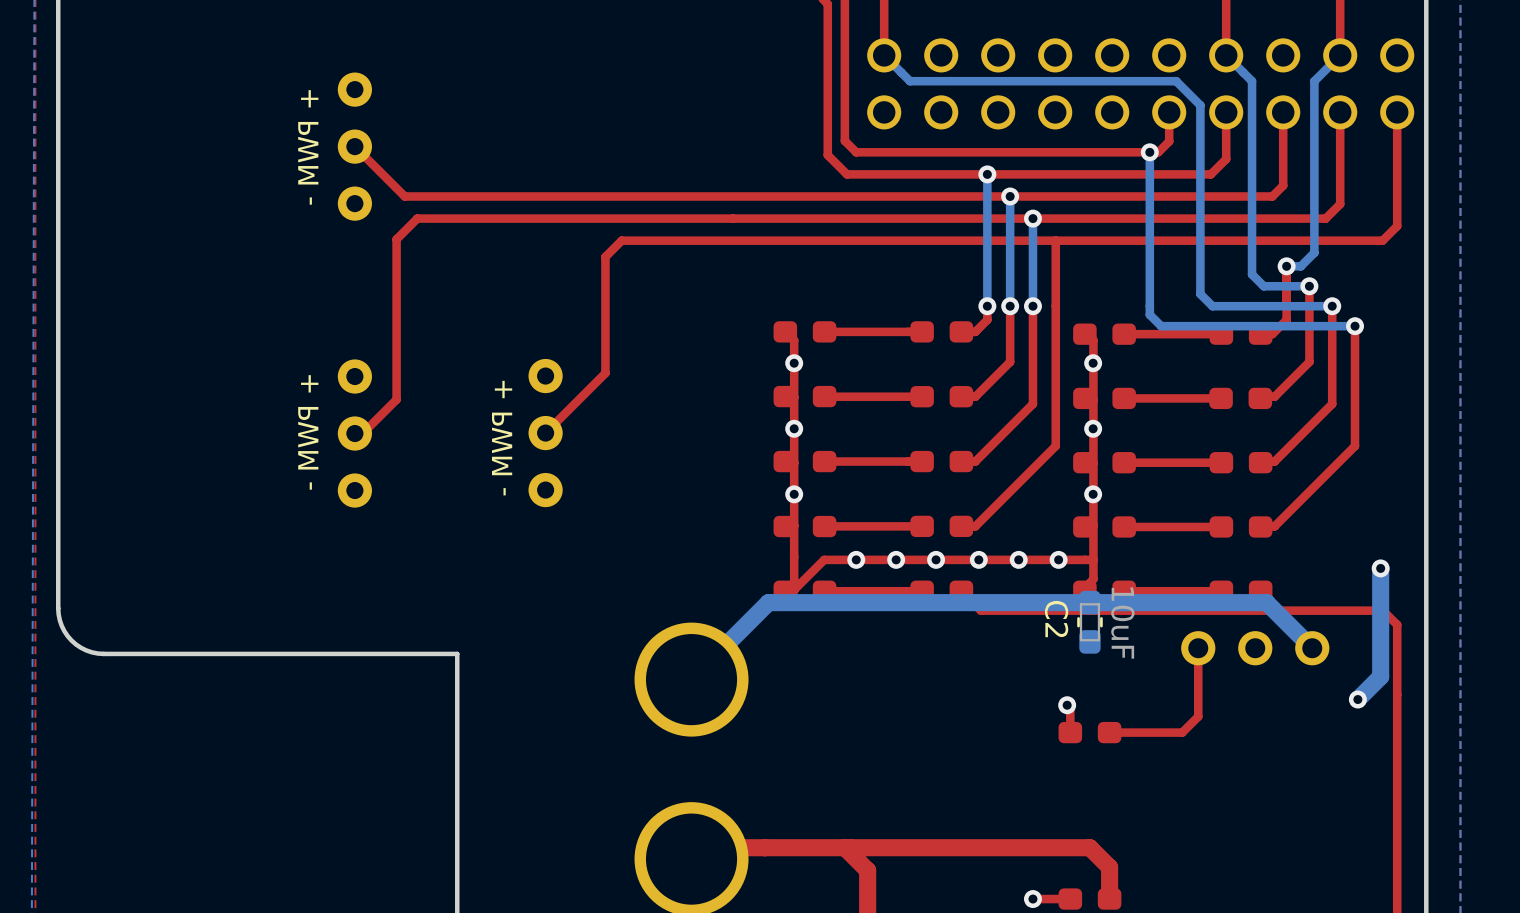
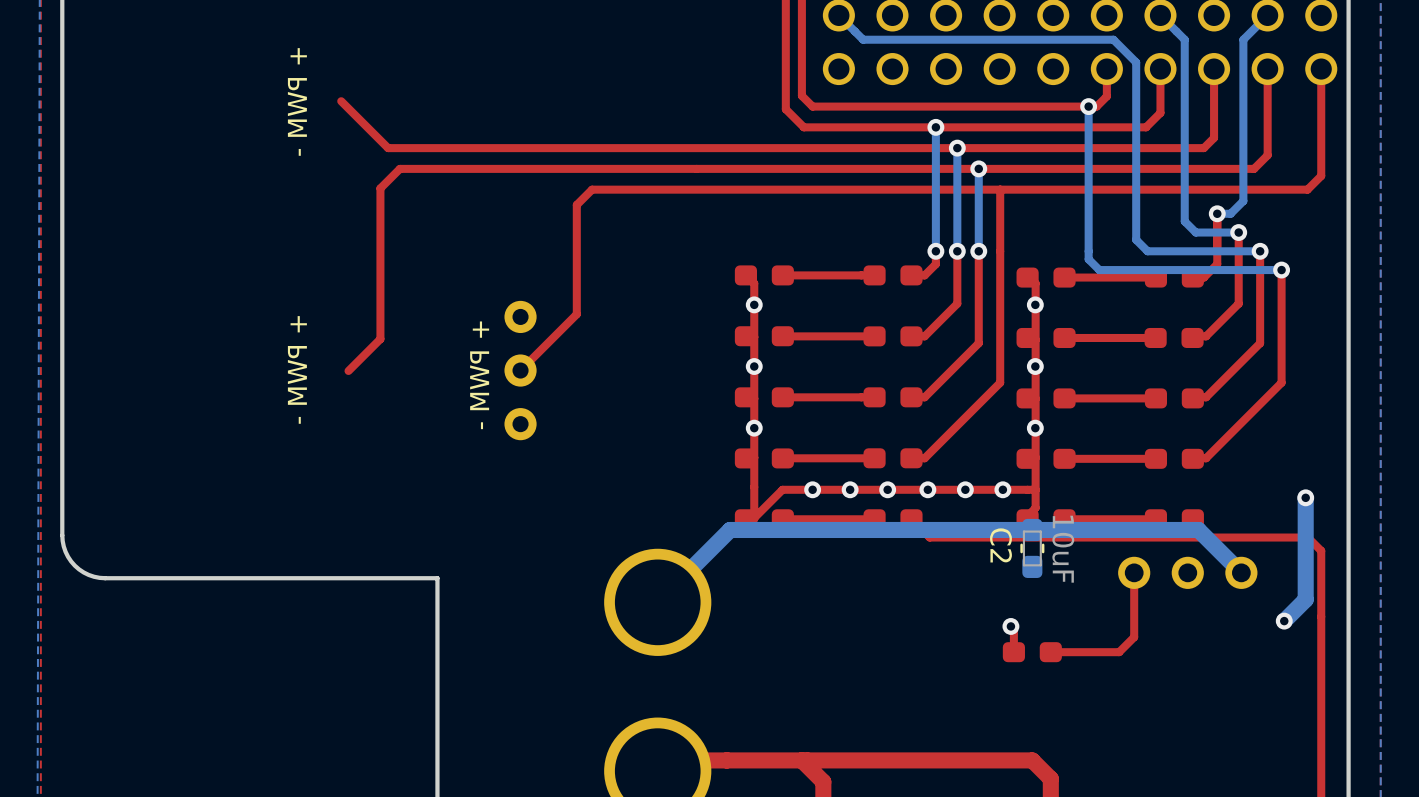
part: (354, 146) -> none
part: (354, 433) -> none

